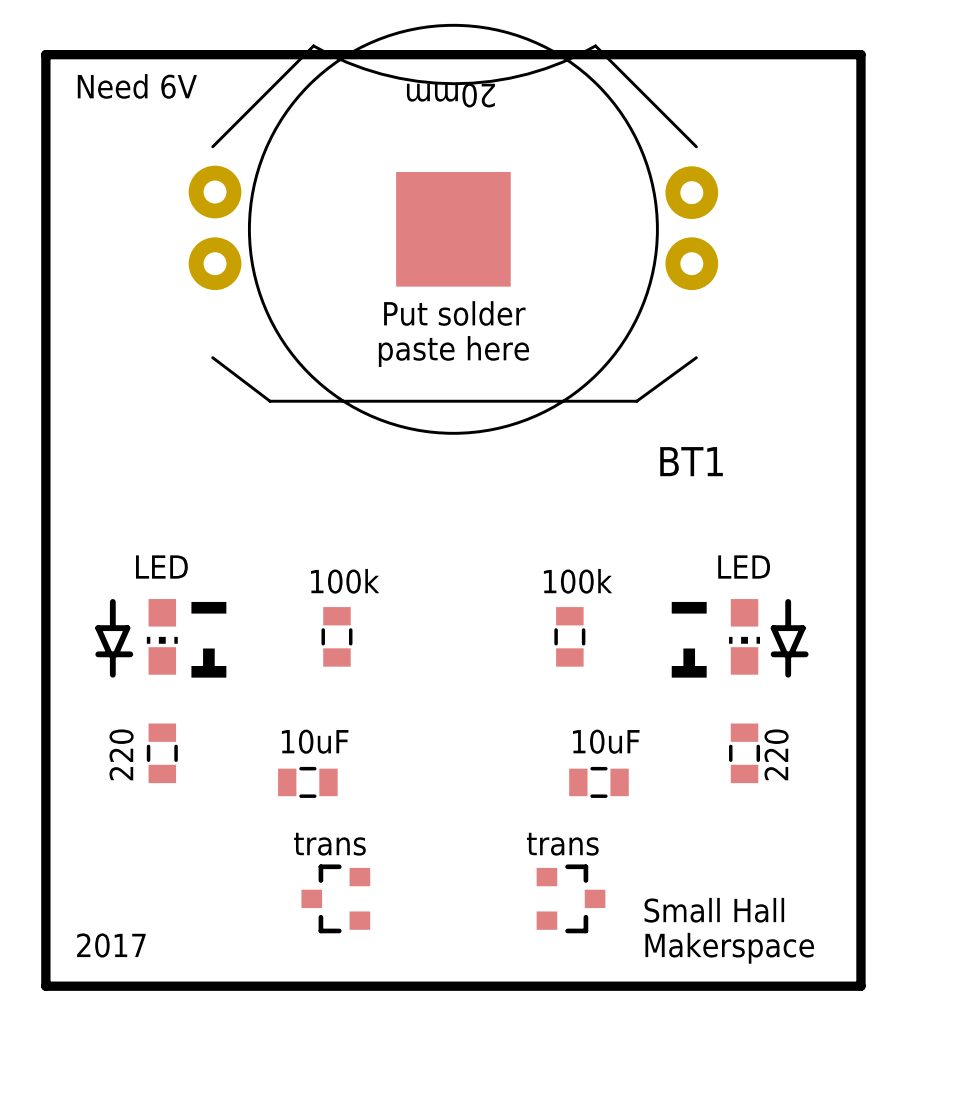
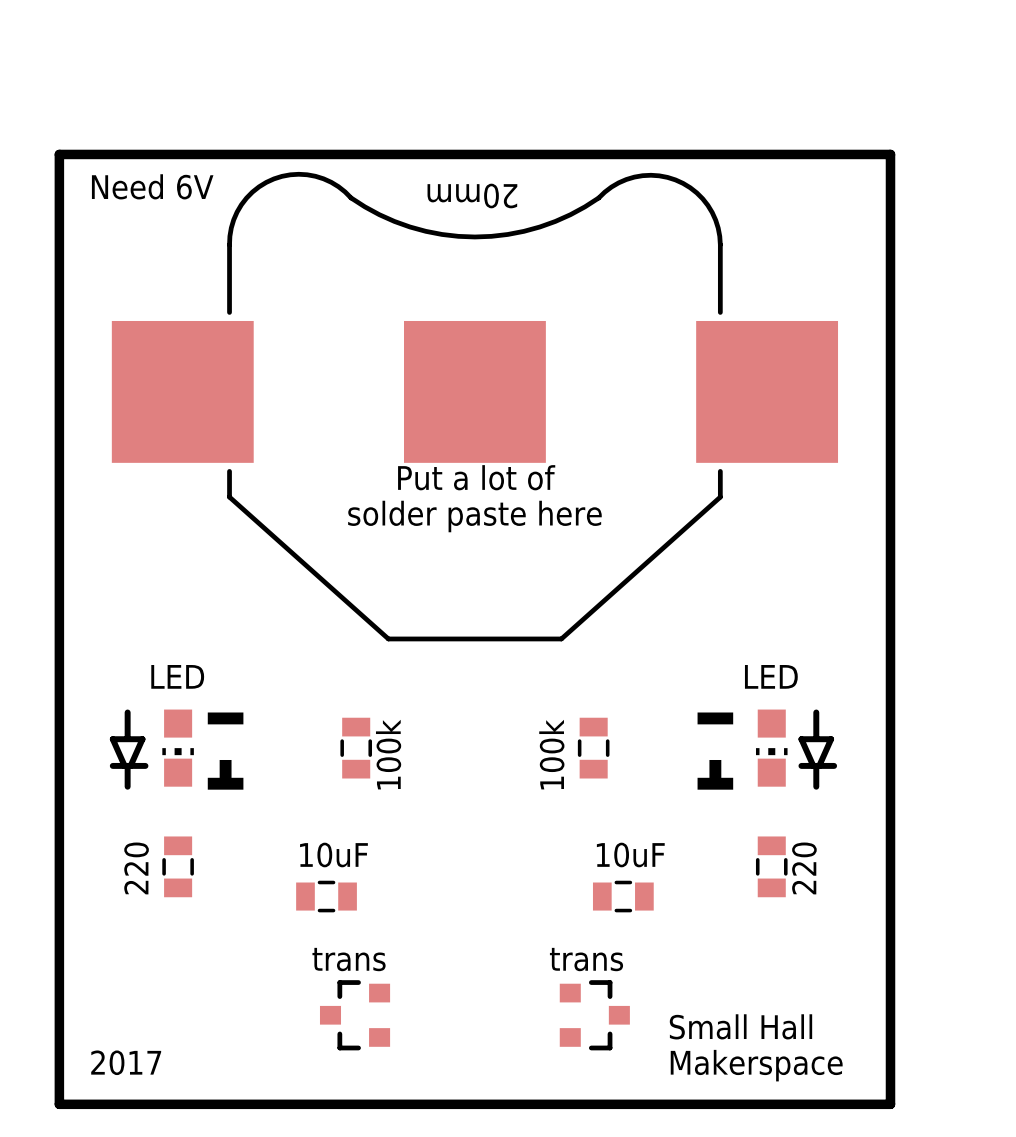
BT1: (453, 229) -> none
part: none -> (474, 406)
text: Put solder (454, 313) -> none
text: paste here (453, 351) -> none
text: none -> Put a lot of (476, 477)
text: none -> solder paste here (474, 516)
text rotation: 0° (345, 581) -> 90° counterclockwise (388, 754)
text rotation: 0° (578, 581) -> 90° counterclockwise (551, 754)

